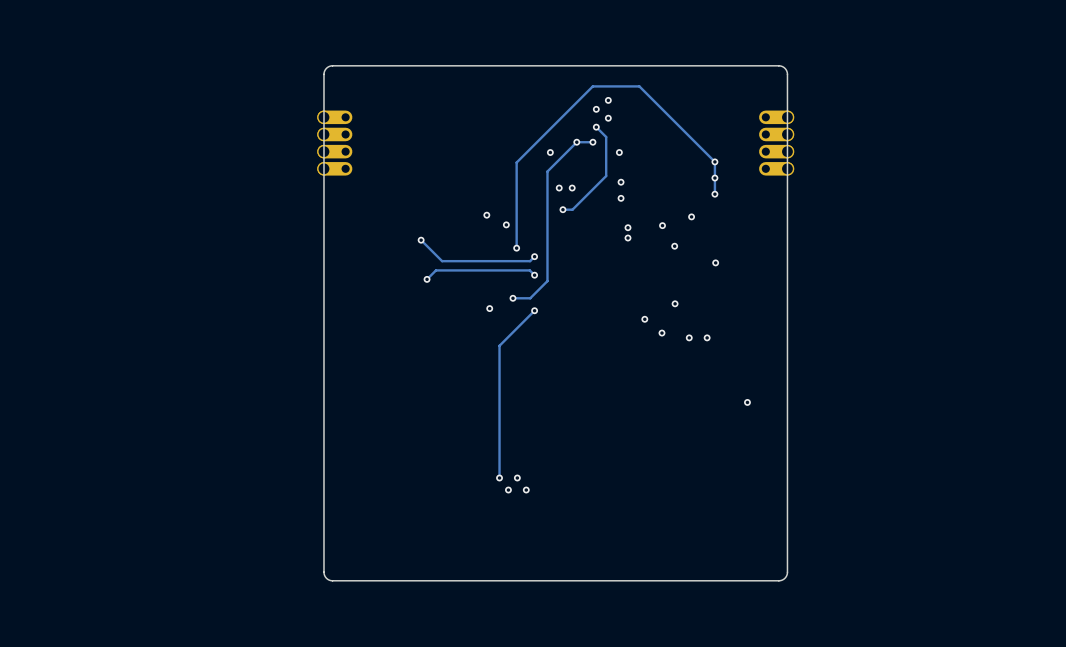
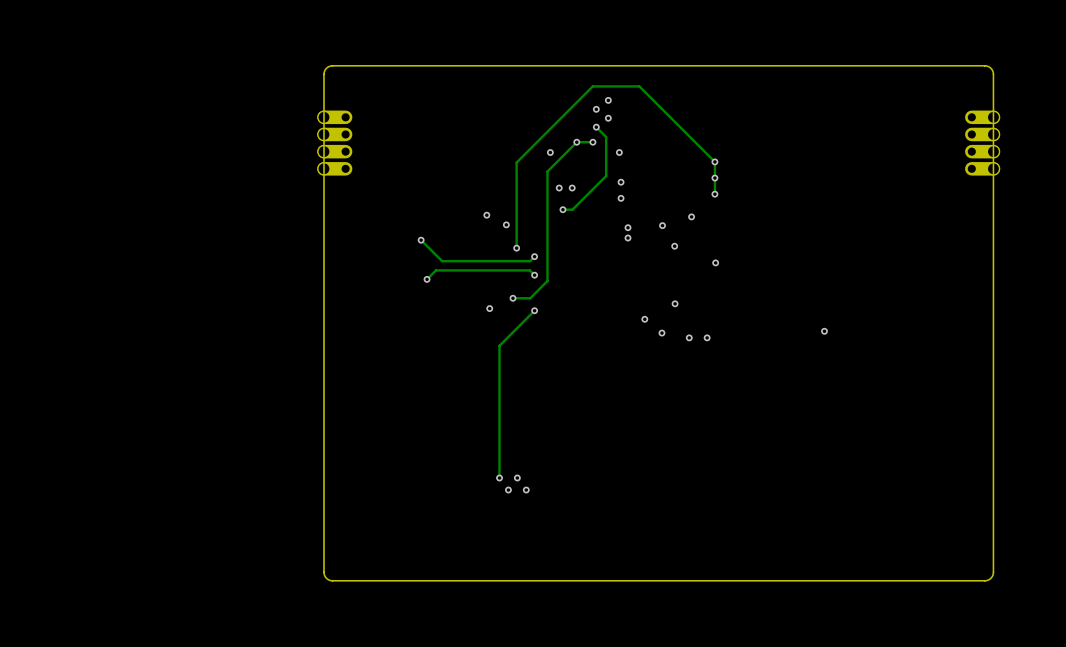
board edge: (778, 65) (784, 68) (787, 74) (787, 572) (784, 578) (778, 580) -> (778, 65) (984, 65) (990, 68) (993, 74) (992, 575) (984, 580) (778, 580)
part: (776, 117) -> none
part: none -> (982, 117)
part: (776, 134) -> none
part: none -> (982, 134)
part: (776, 151) -> none
part: none -> (982, 151)
part: (776, 168) -> none
part: none -> (982, 168)
via: none -> (824, 331)
via: (747, 402) -> none

